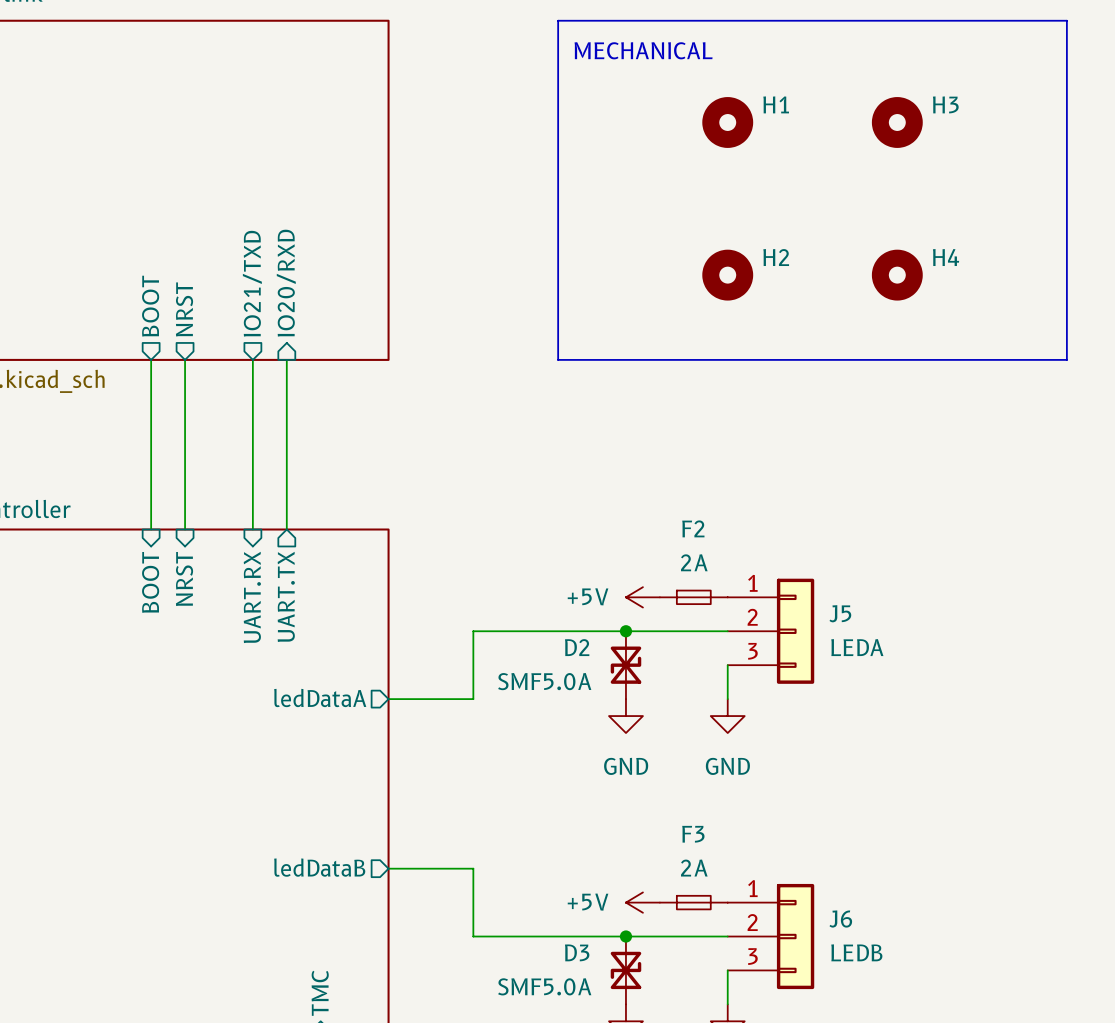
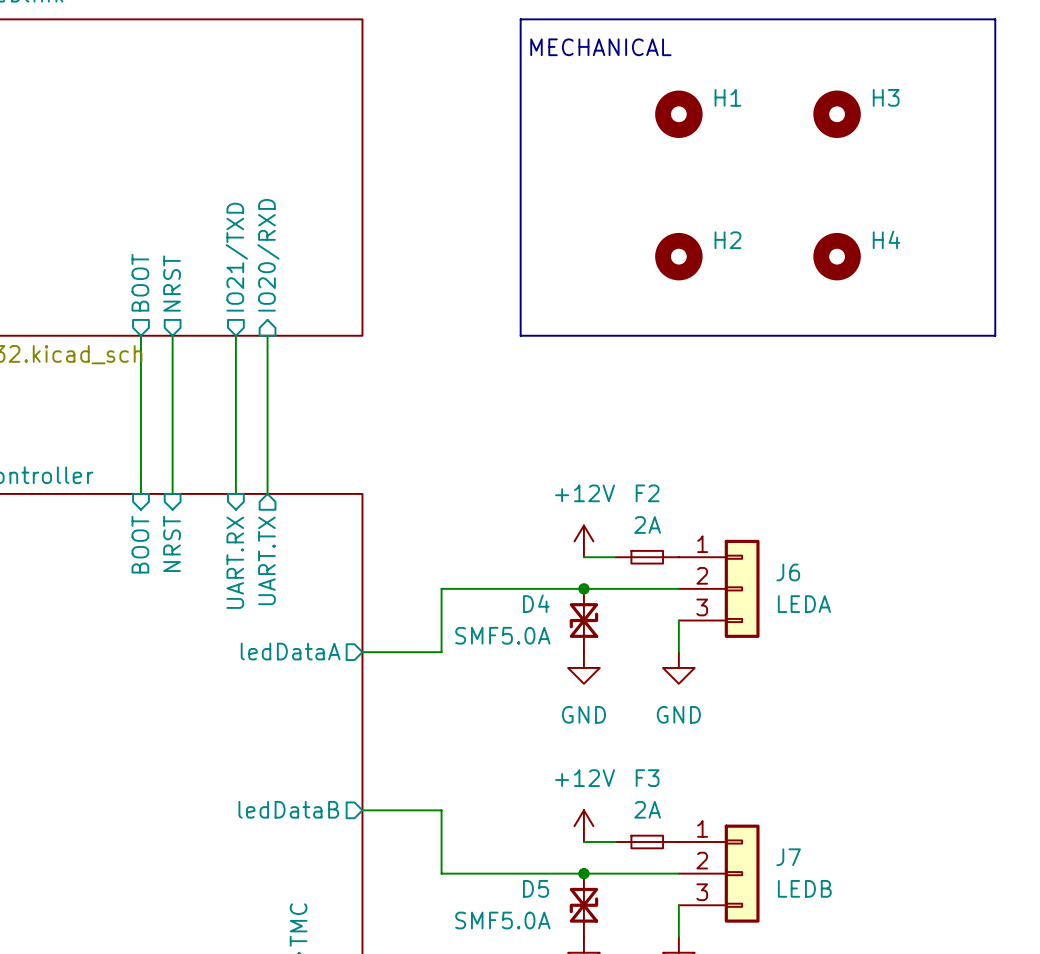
power symbol: none -> +12V (583, 541)
power symbol: +5V (642, 597) -> none
J5 name: J5 (840, 613) -> J6 (788, 572)
D2 name: D2 (577, 647) -> D4 (536, 603)
power symbol: none -> +12V (583, 826)
power symbol: +5V (642, 902) -> none
J6 name: J6 (840, 919) -> J7 (788, 857)
D3 name: D3 (577, 952) -> D5 (535, 888)

